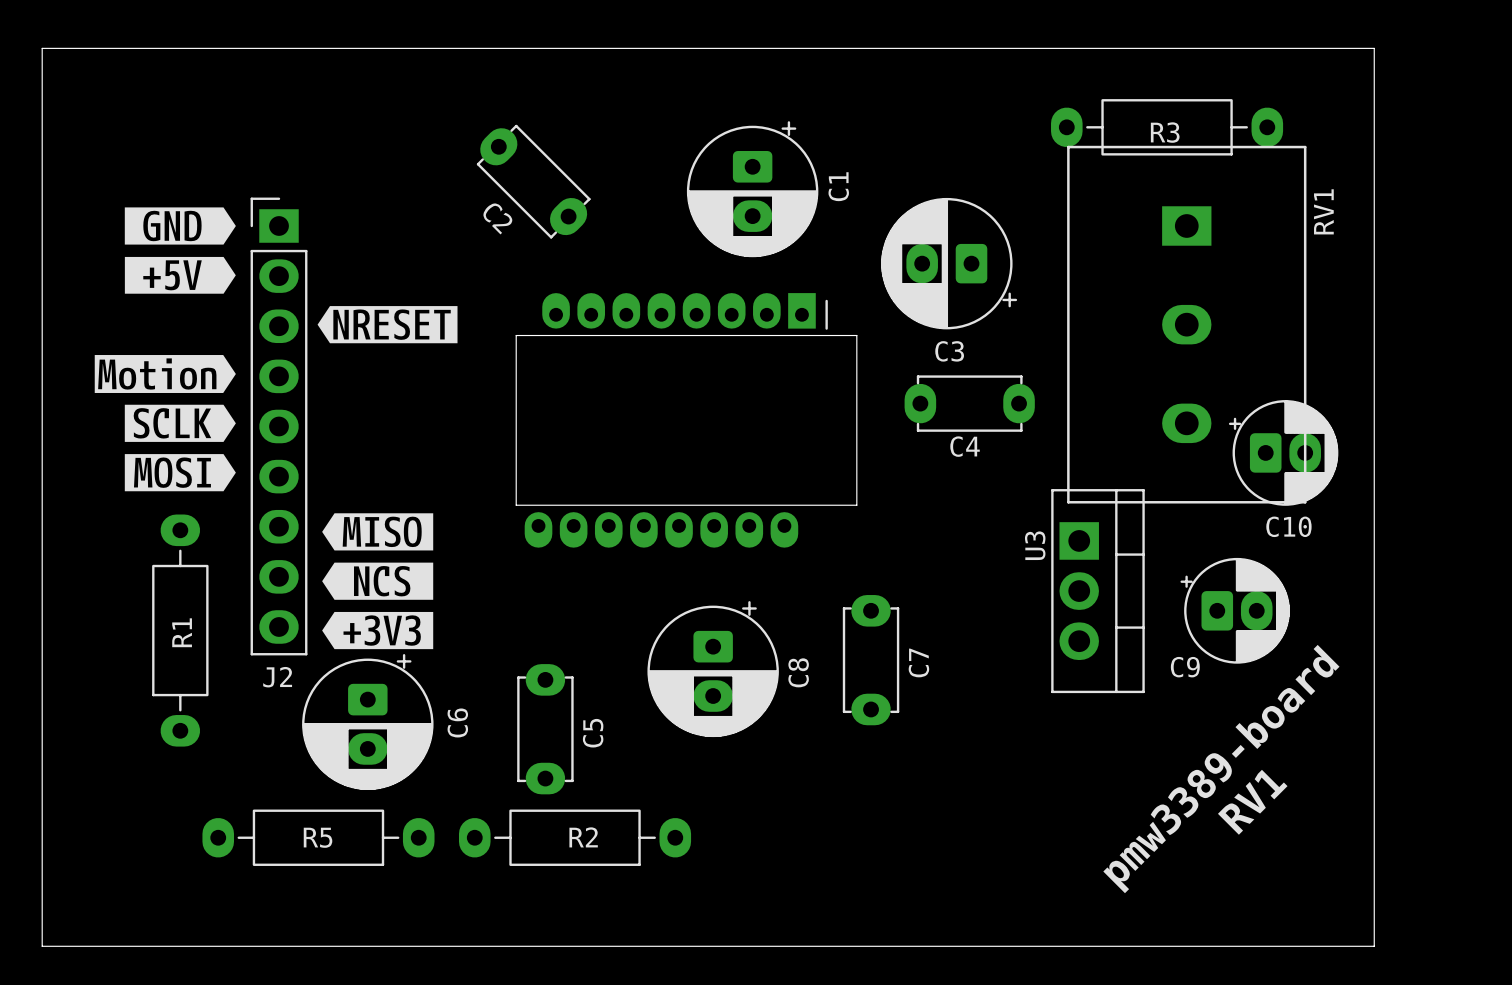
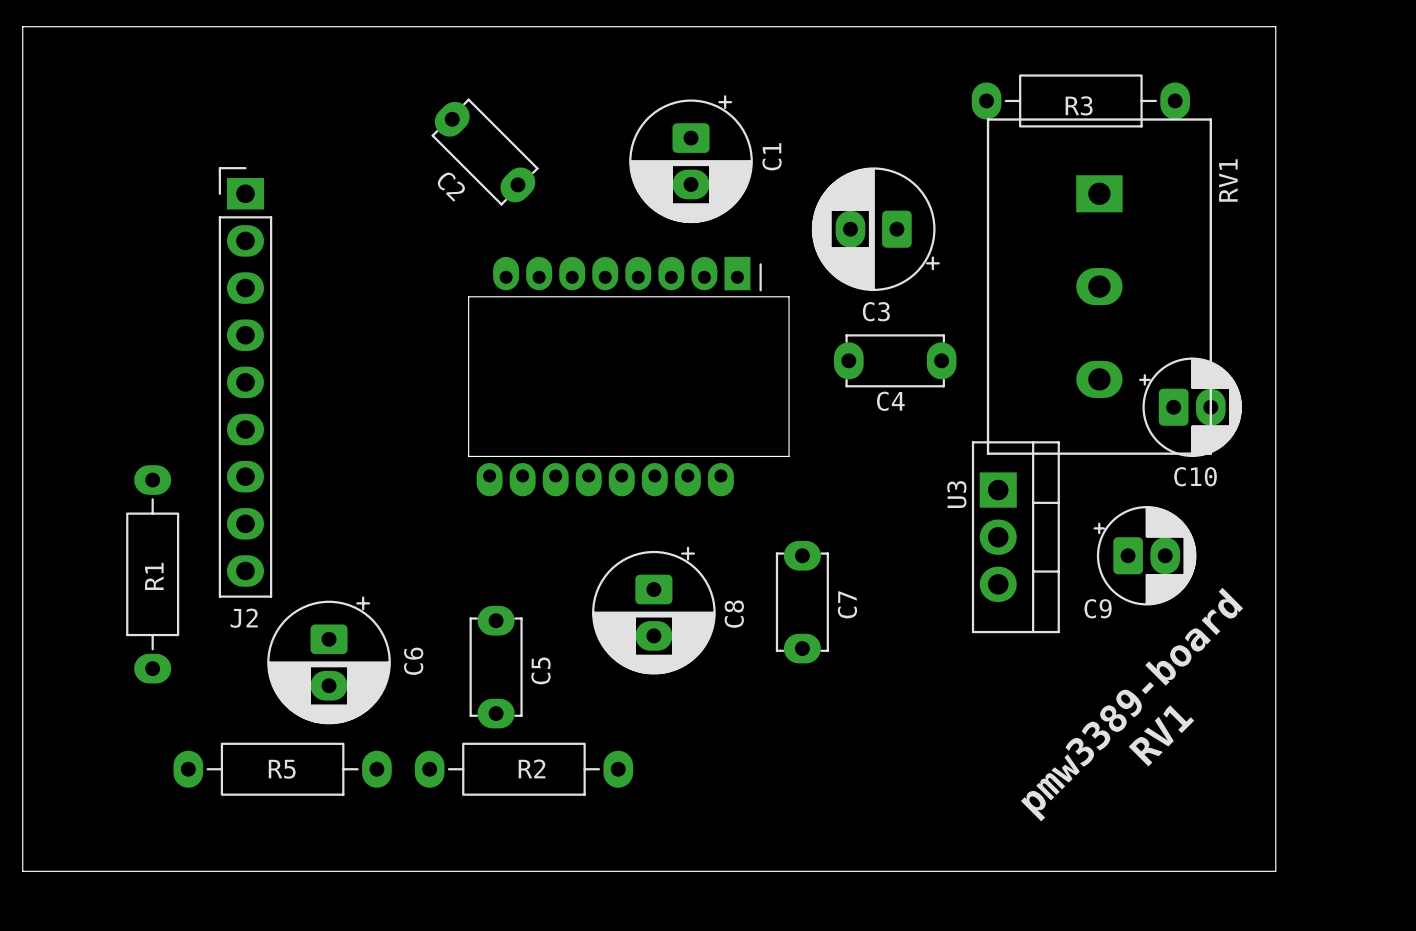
drawing: [124, 207, 236, 294] -> none
drawing: [317, 306, 458, 344] -> none
drawing: [94, 355, 236, 492] -> none
drawing: [322, 513, 434, 650] -> none

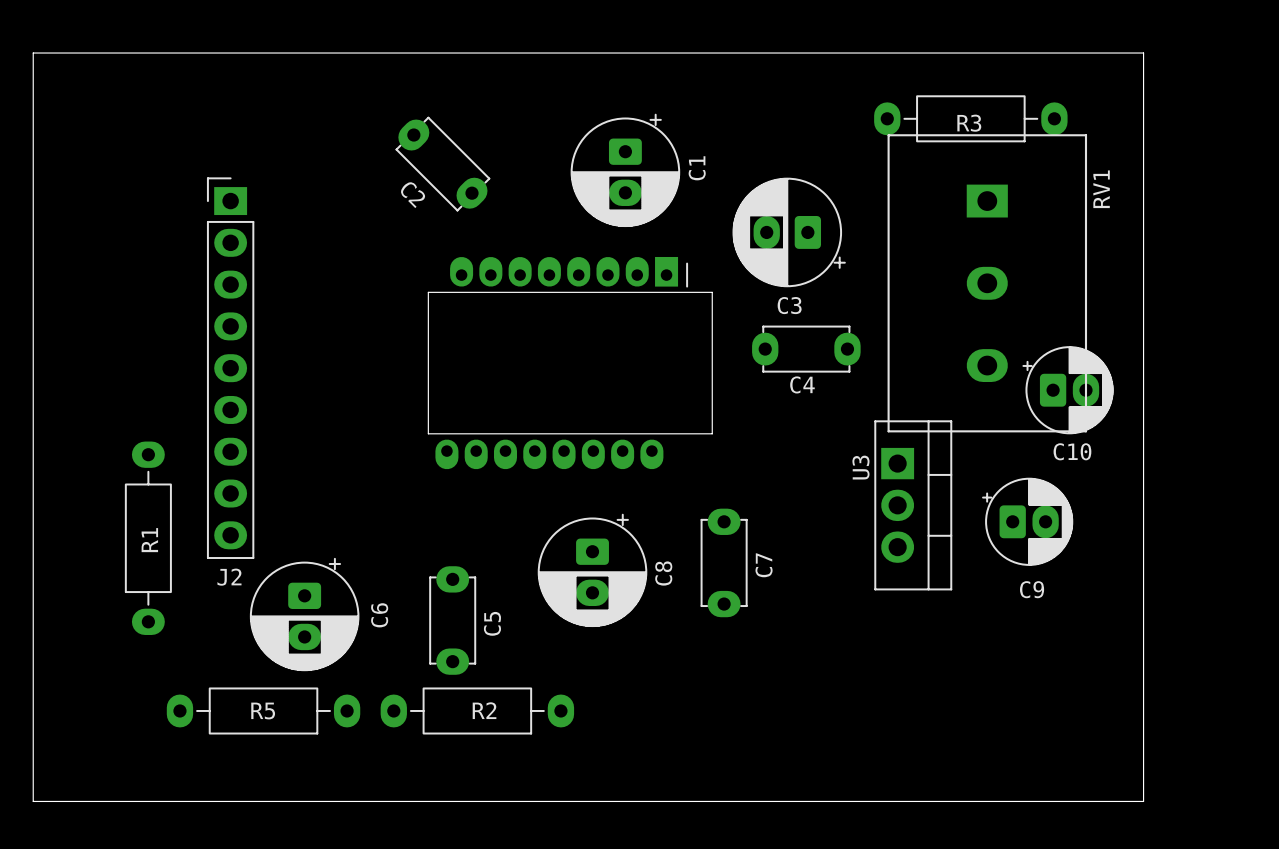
C9 name position: C9 (1098, 608) -> C9 (1032, 589)
text: pmw3389-board (1131, 704) -> none
text: RV1 (1161, 735) -> none

